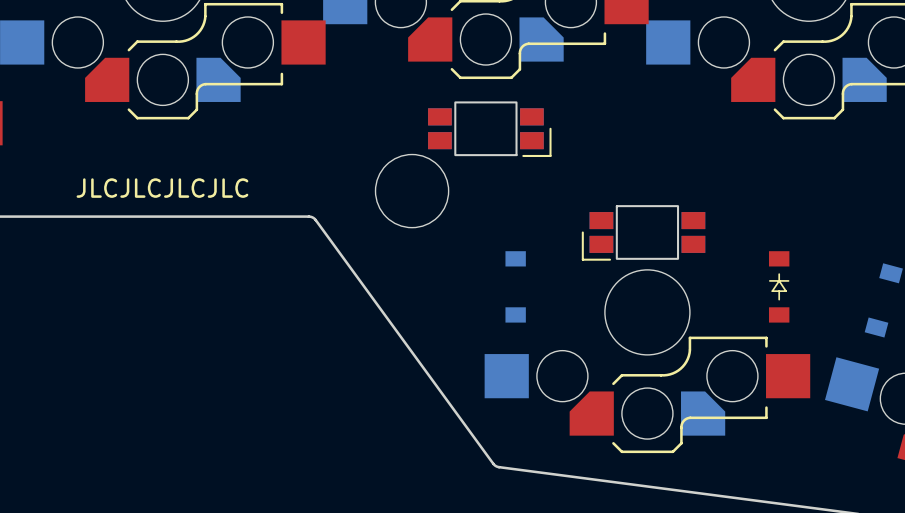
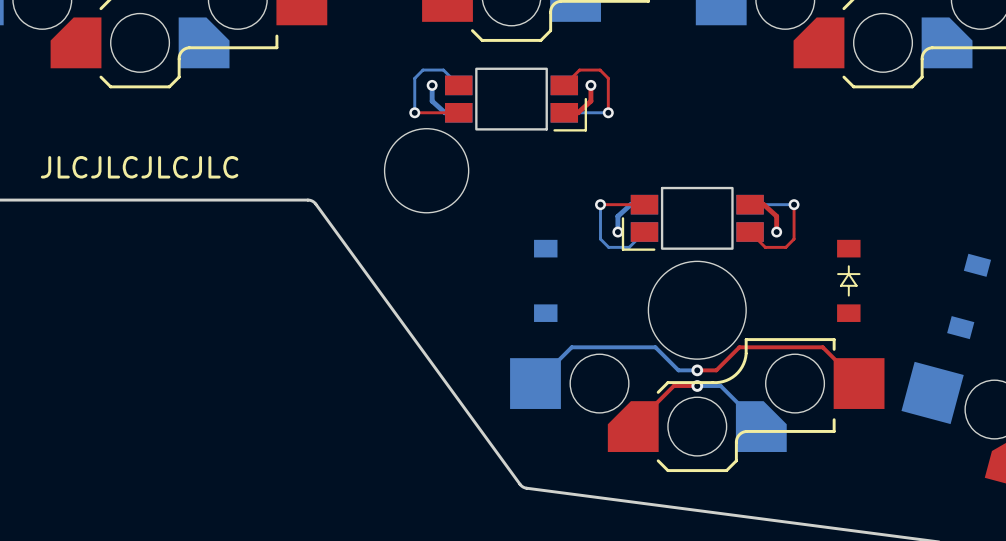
bottom track: none -> (432, 85) (432, 101) (445, 112) (458, 112)
via: none -> (432, 85)
bottom track: none -> (458, 85) (443, 70) (422, 70) (414, 78) (414, 112)
top track: none -> (564, 85) (579, 70) (600, 70) (608, 78) (608, 112)
top track: none -> (590, 85) (590, 101) (578, 112) (564, 112)
via: none -> (590, 85)
top track: none -> (414, 112) (458, 112)
via: none -> (414, 112)
bottom track: none -> (564, 112) (608, 112)
via: none -> (608, 112)
top track: none -> (600, 204) (644, 204)
bottom track: none -> (600, 204) (600, 239) (608, 247) (629, 247) (644, 232)
via: none -> (600, 204)
bottom track: none -> (644, 204) (630, 204) (617, 216) (617, 232)
top track: none -> (750, 204) (763, 204) (776, 216) (776, 232)
bottom track: none -> (750, 204) (794, 204)
top track: none -> (794, 204) (794, 239) (785, 247) (765, 247) (750, 232)
via: none -> (794, 204)
via: none -> (617, 232)
via: none -> (776, 232)
top track: none -> (697, 370) (716, 370) (739, 347) (822, 347) (859, 383)
bottom track: none -> (697, 370) (678, 370) (655, 347) (571, 347) (535, 383)
via: none -> (697, 370)
top track: none -> (697, 386) (673, 386) (633, 426)
bottom track: none -> (697, 386) (720, 386) (761, 426)
via: none -> (697, 386)

